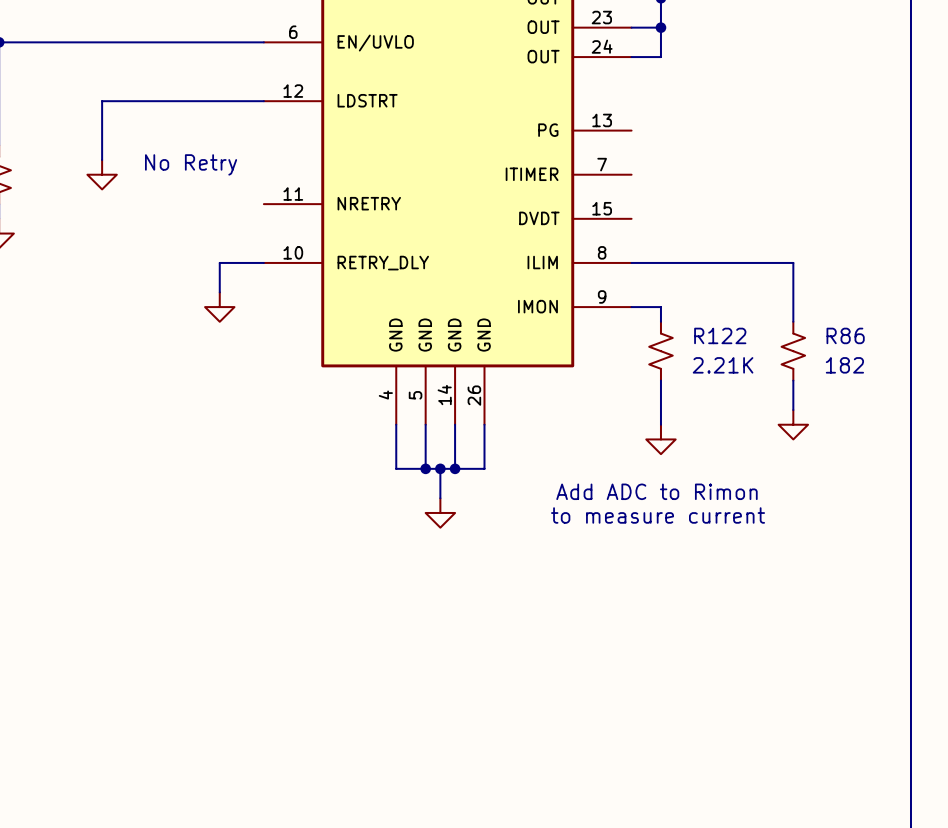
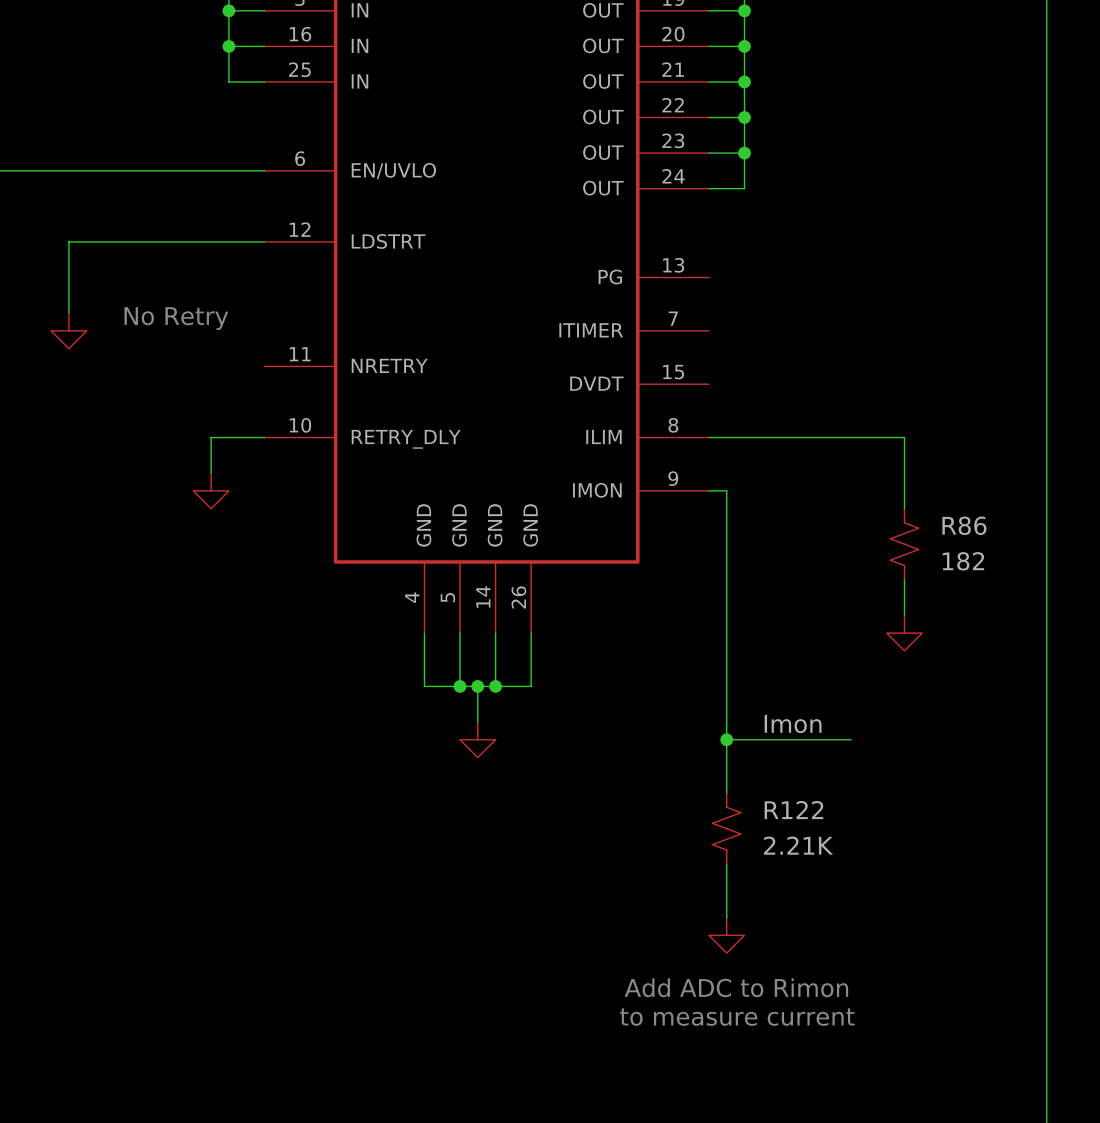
wire: (646, 307) (660, 307) (660, 321) -> (726, 490) (726, 793)
R122 position: (660, 351) -> (726, 828)
wire: (660, 380) (660, 424) -> (726, 864) (726, 917)
power symbol position: (660, 439) -> (726, 935)
text position: Add ADC to Rimon (656, 491) -> Add ADC to Rimon (736, 987)
label: none -> Imon (793, 724)
wire: none -> (726, 739) (851, 739)
junction: none -> (726, 739)
text position: to measure current (658, 515) -> to measure current (737, 1017)

